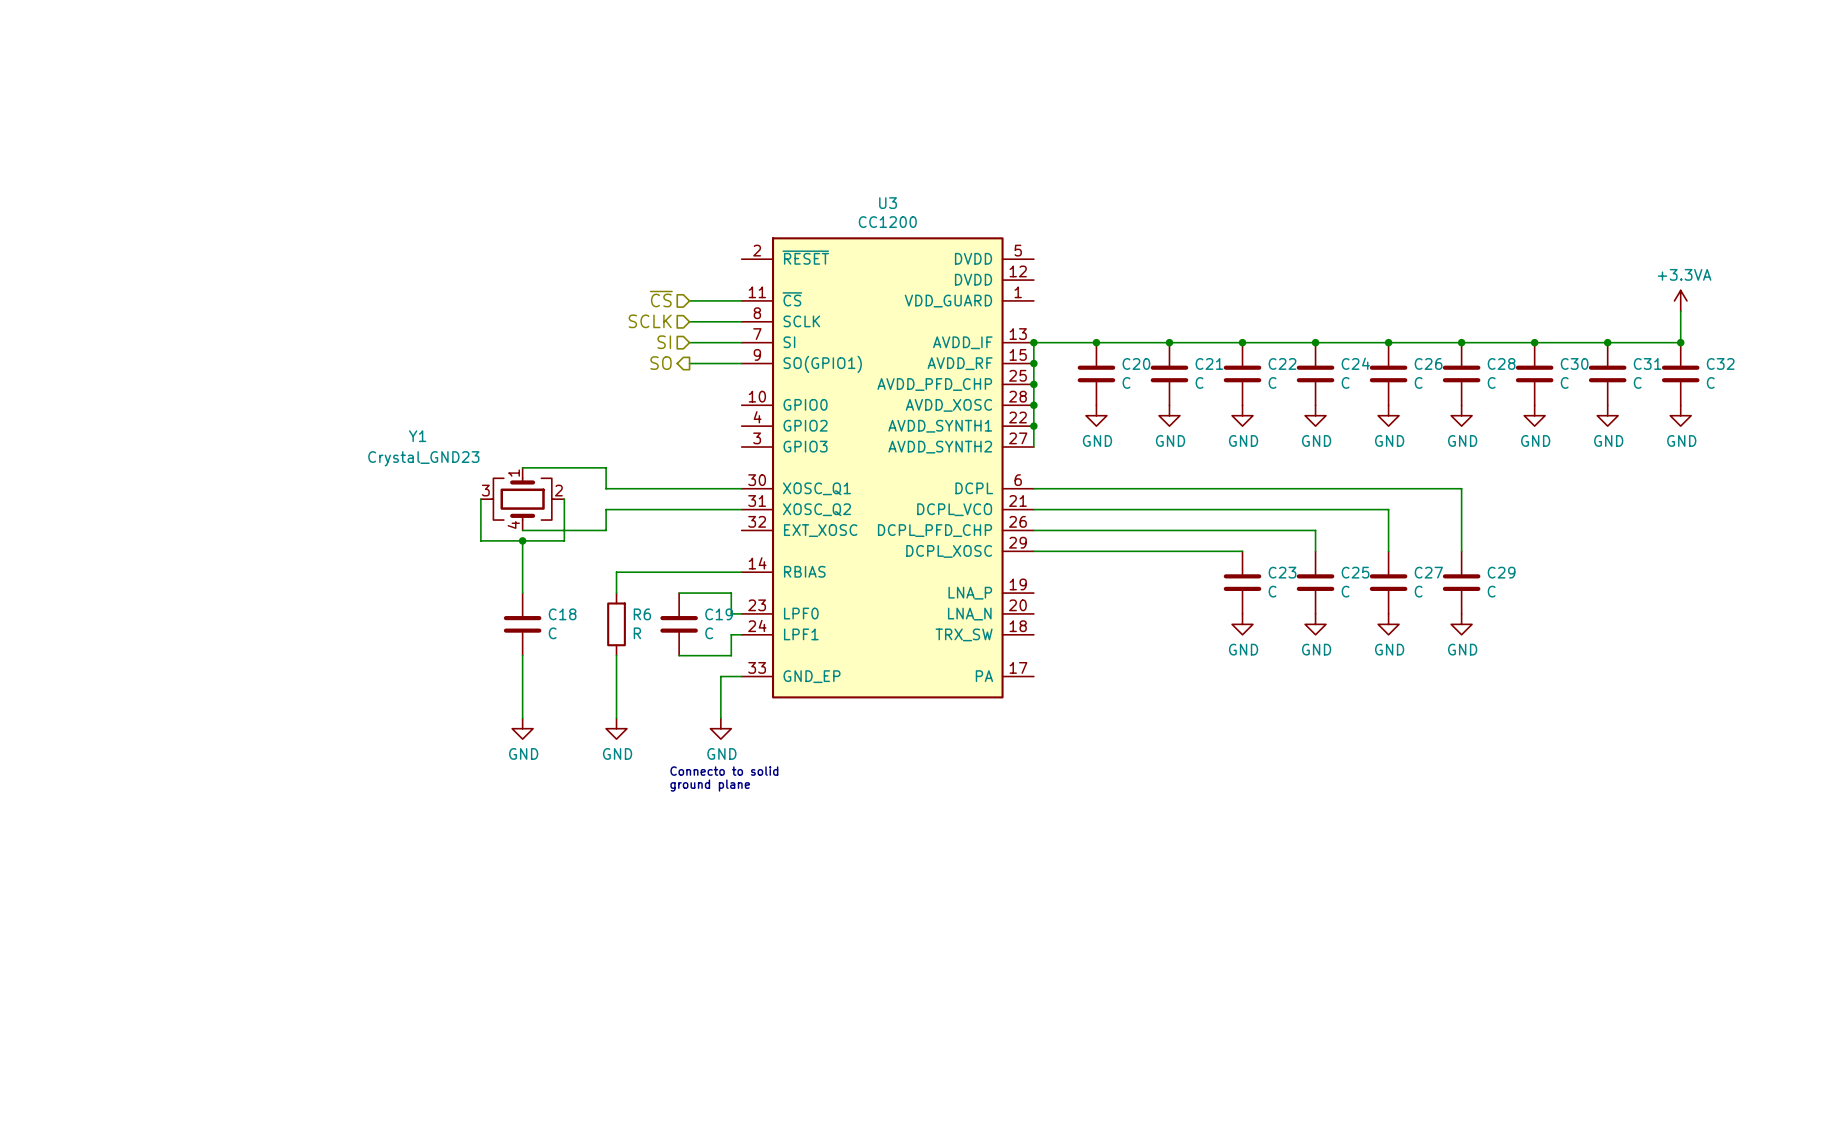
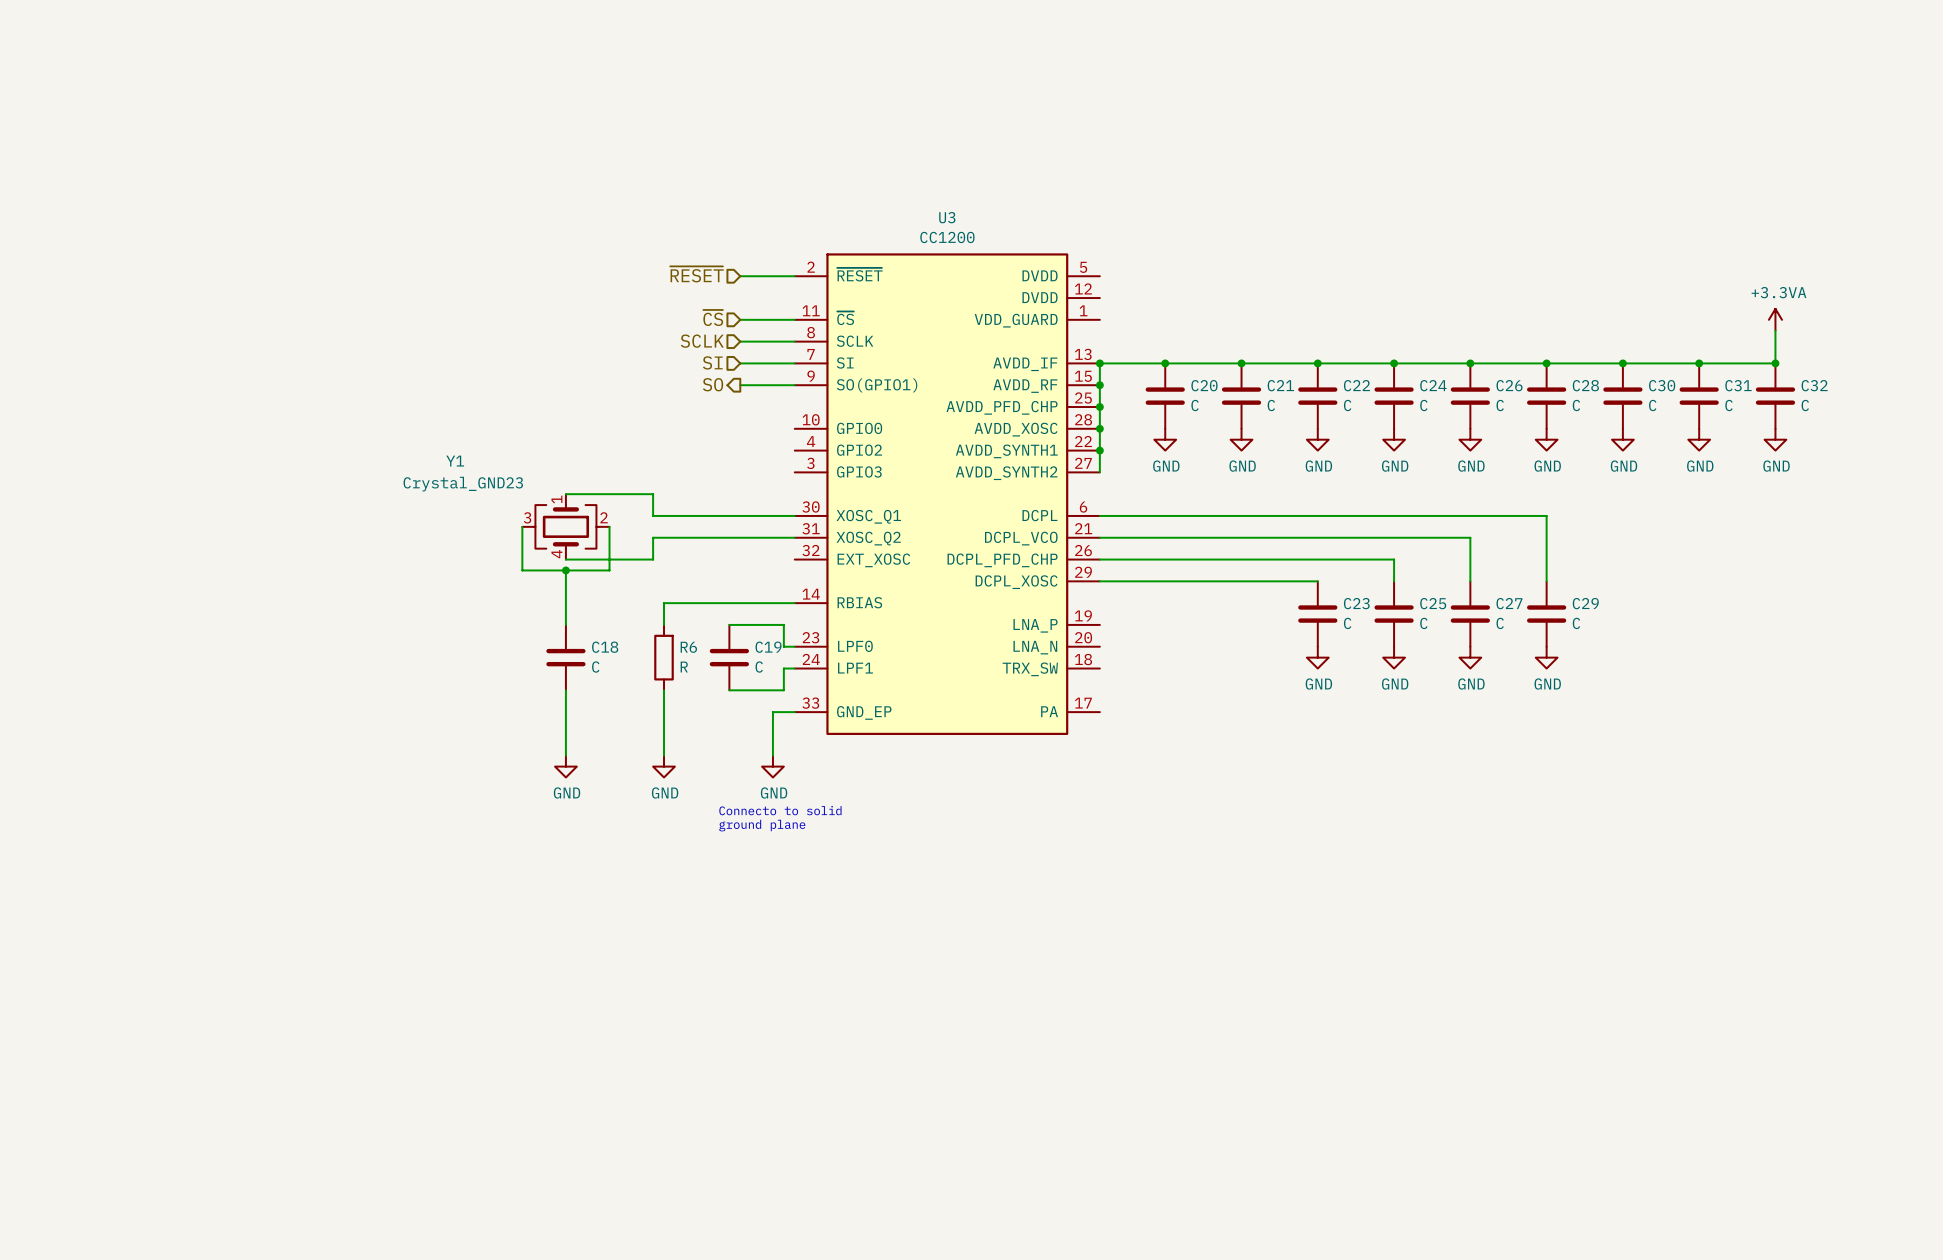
hierarchical label: none -> ~{RESET} (696, 274)
wire: none -> (740, 276) (794, 276)

